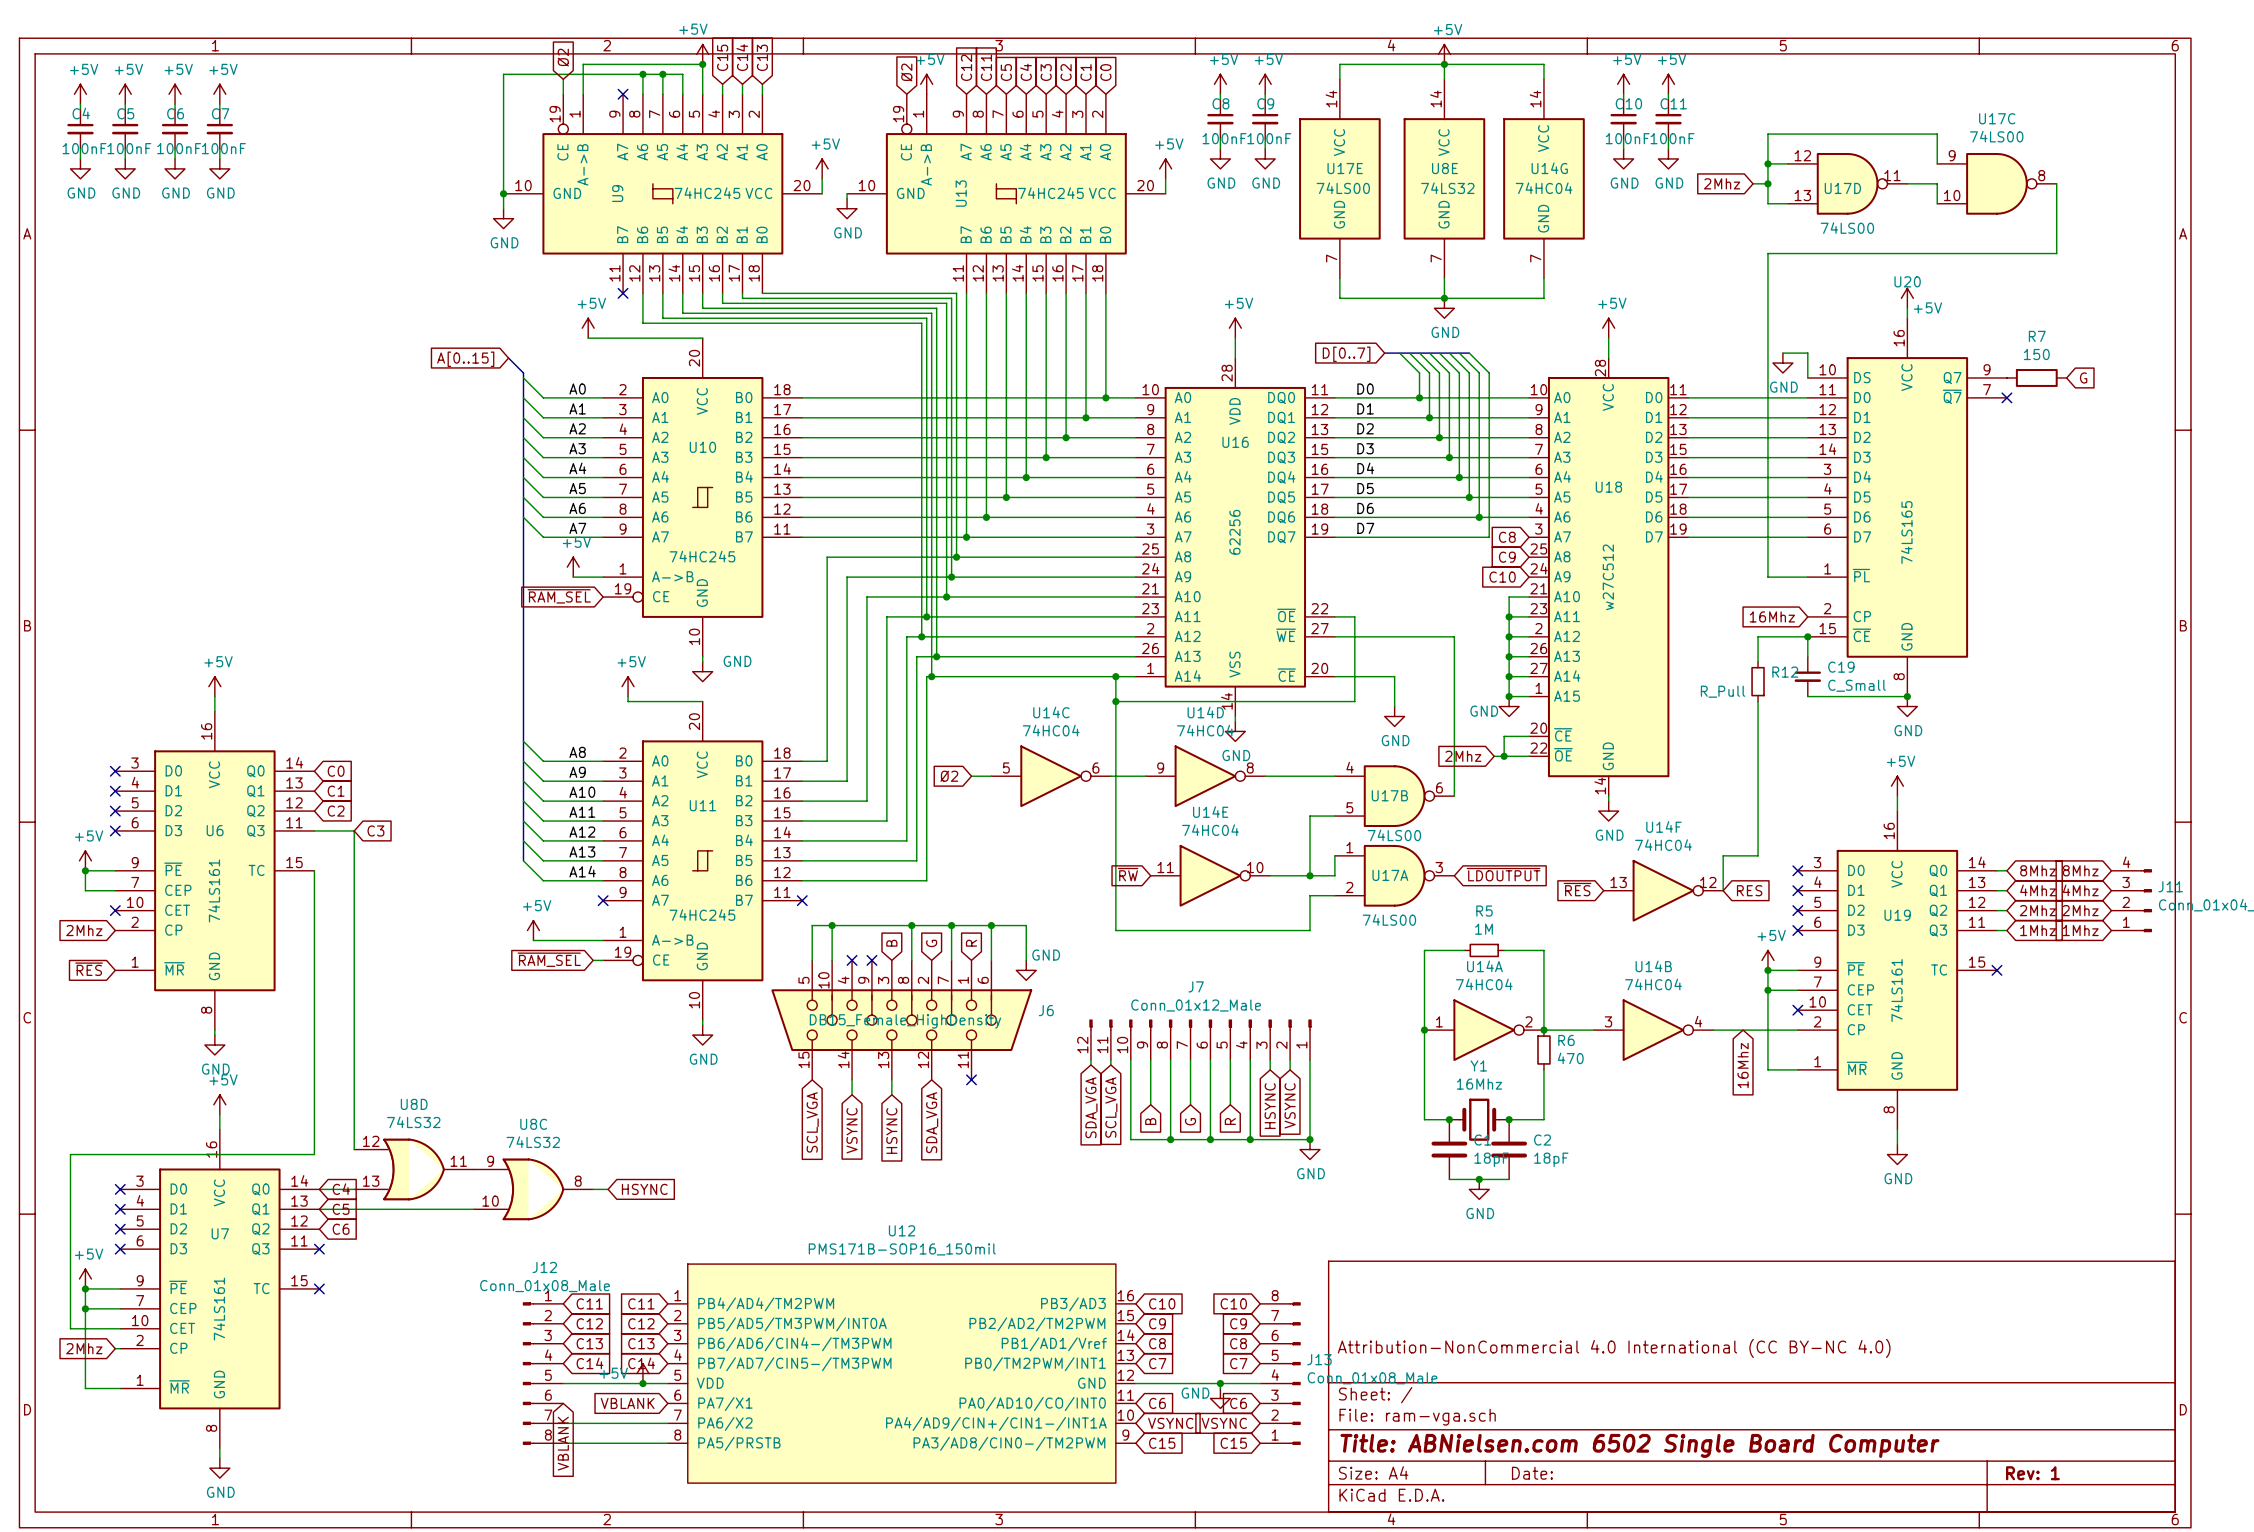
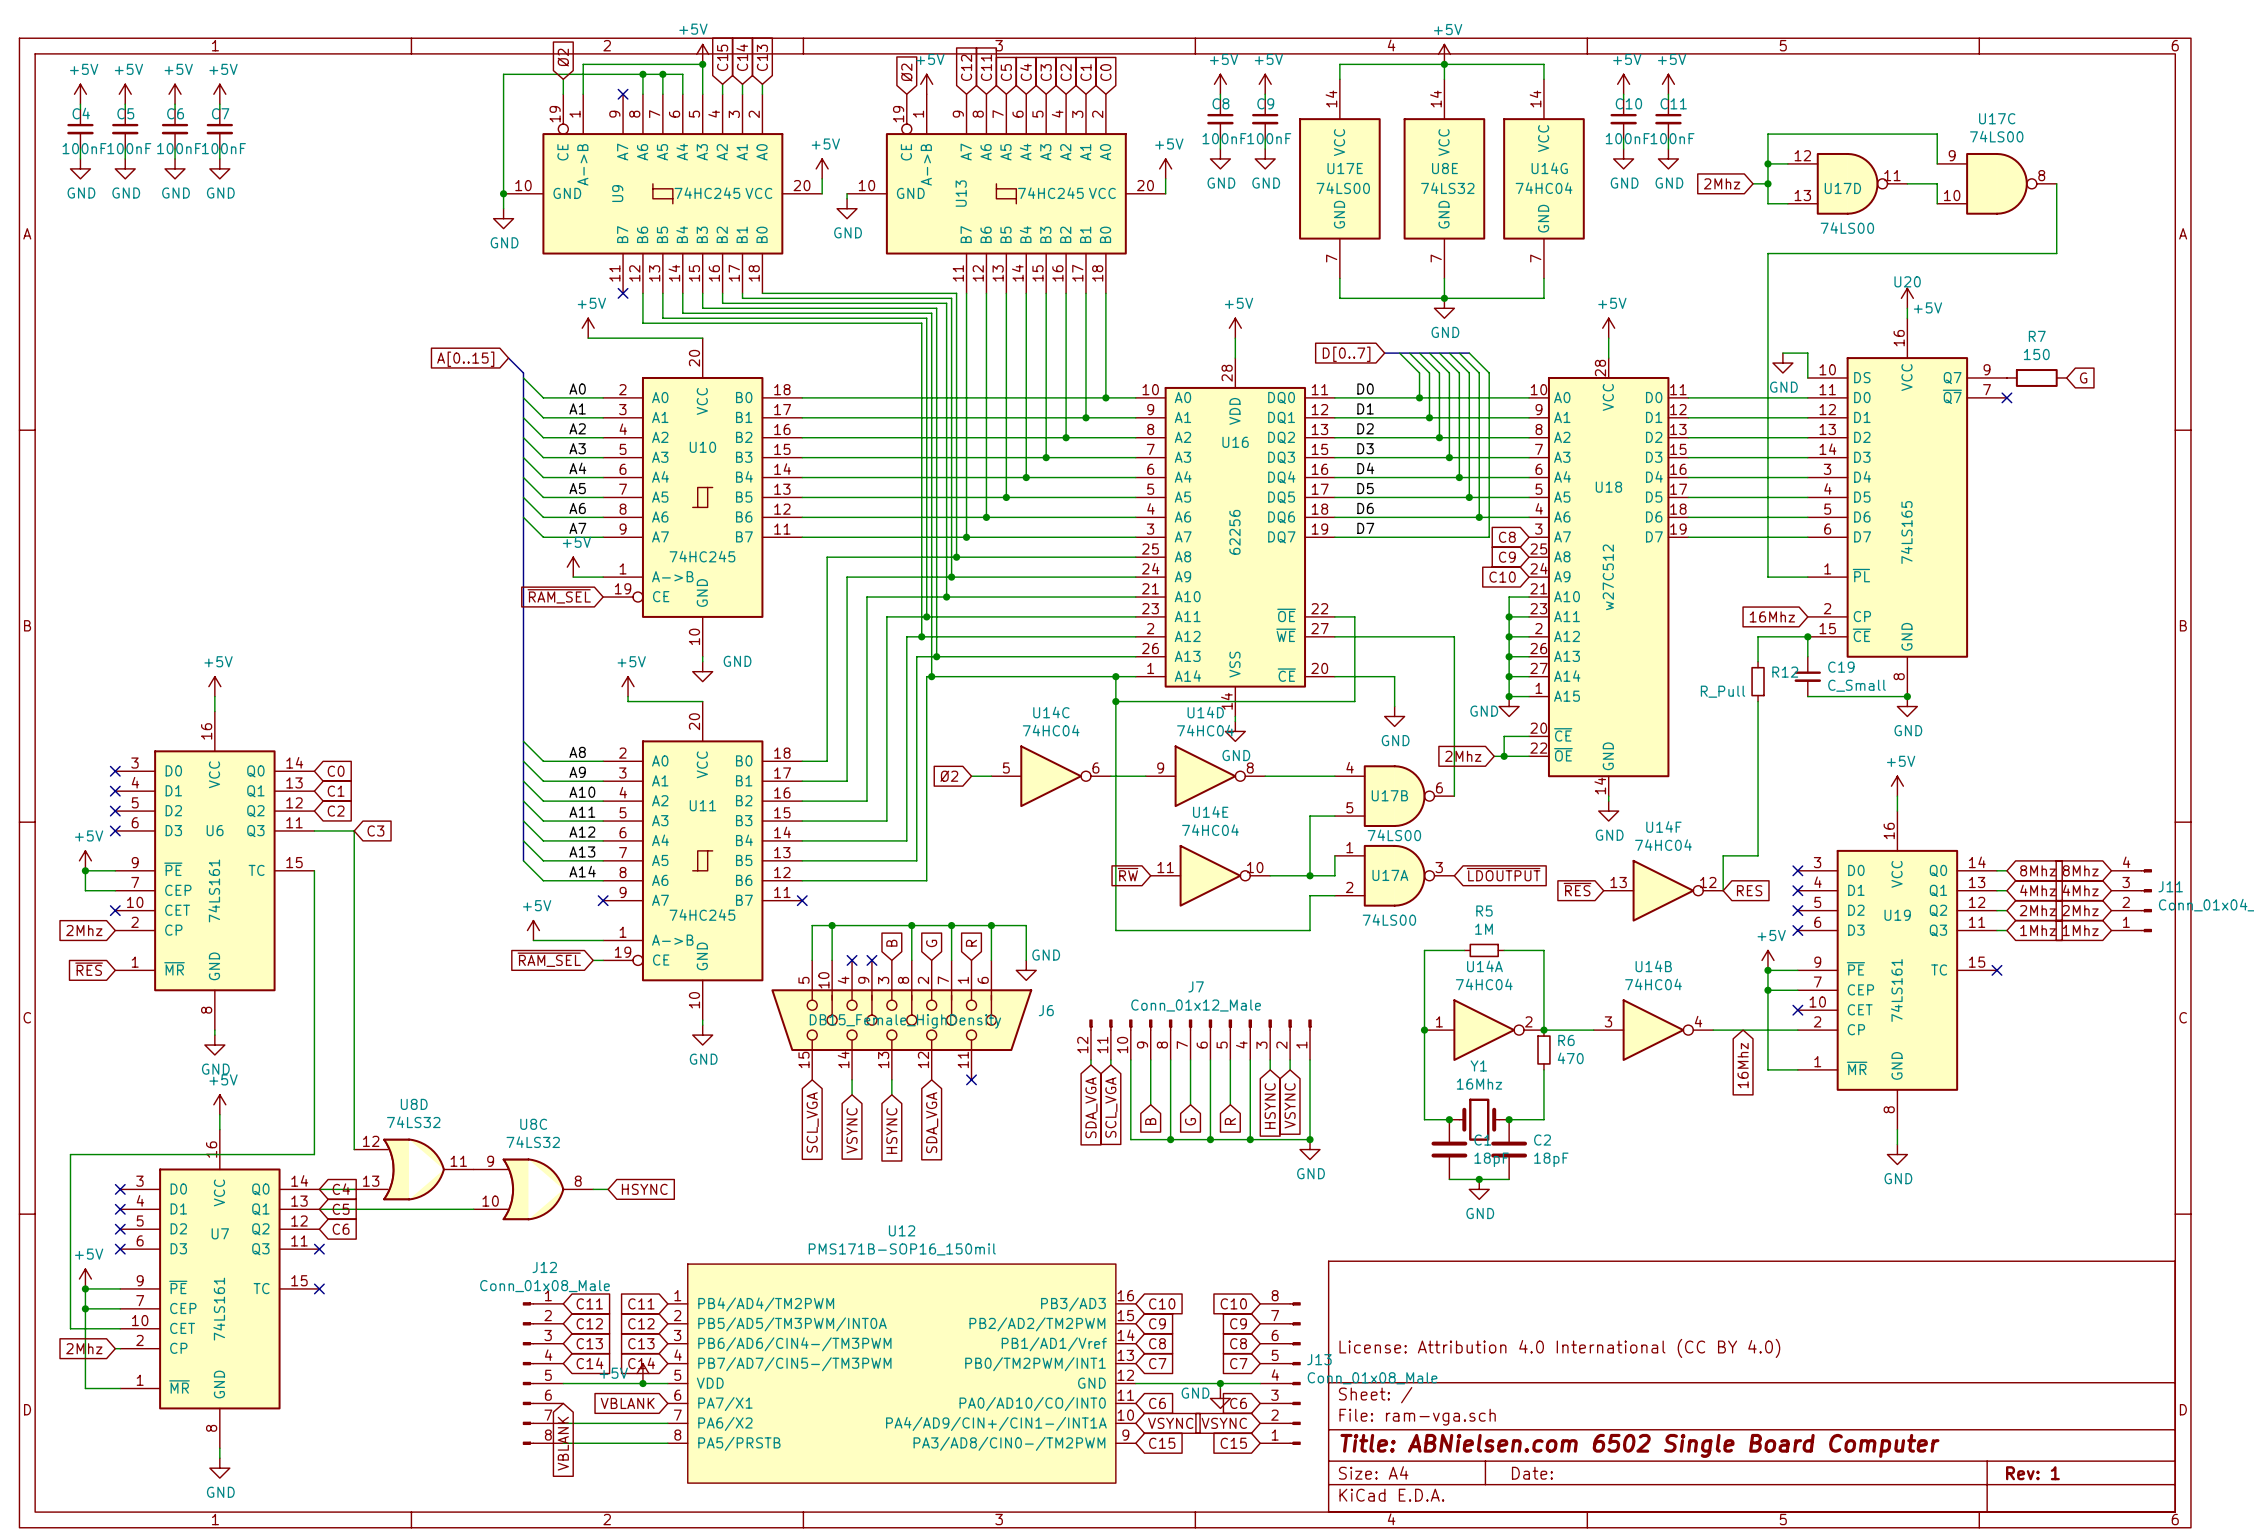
title block: Attribution-NonCommercial 4.0 International (CC BY-NC 4.0) (1614, 1348) -> License: Attribution 4.0 International (CC BY 4.0) (1559, 1348)

